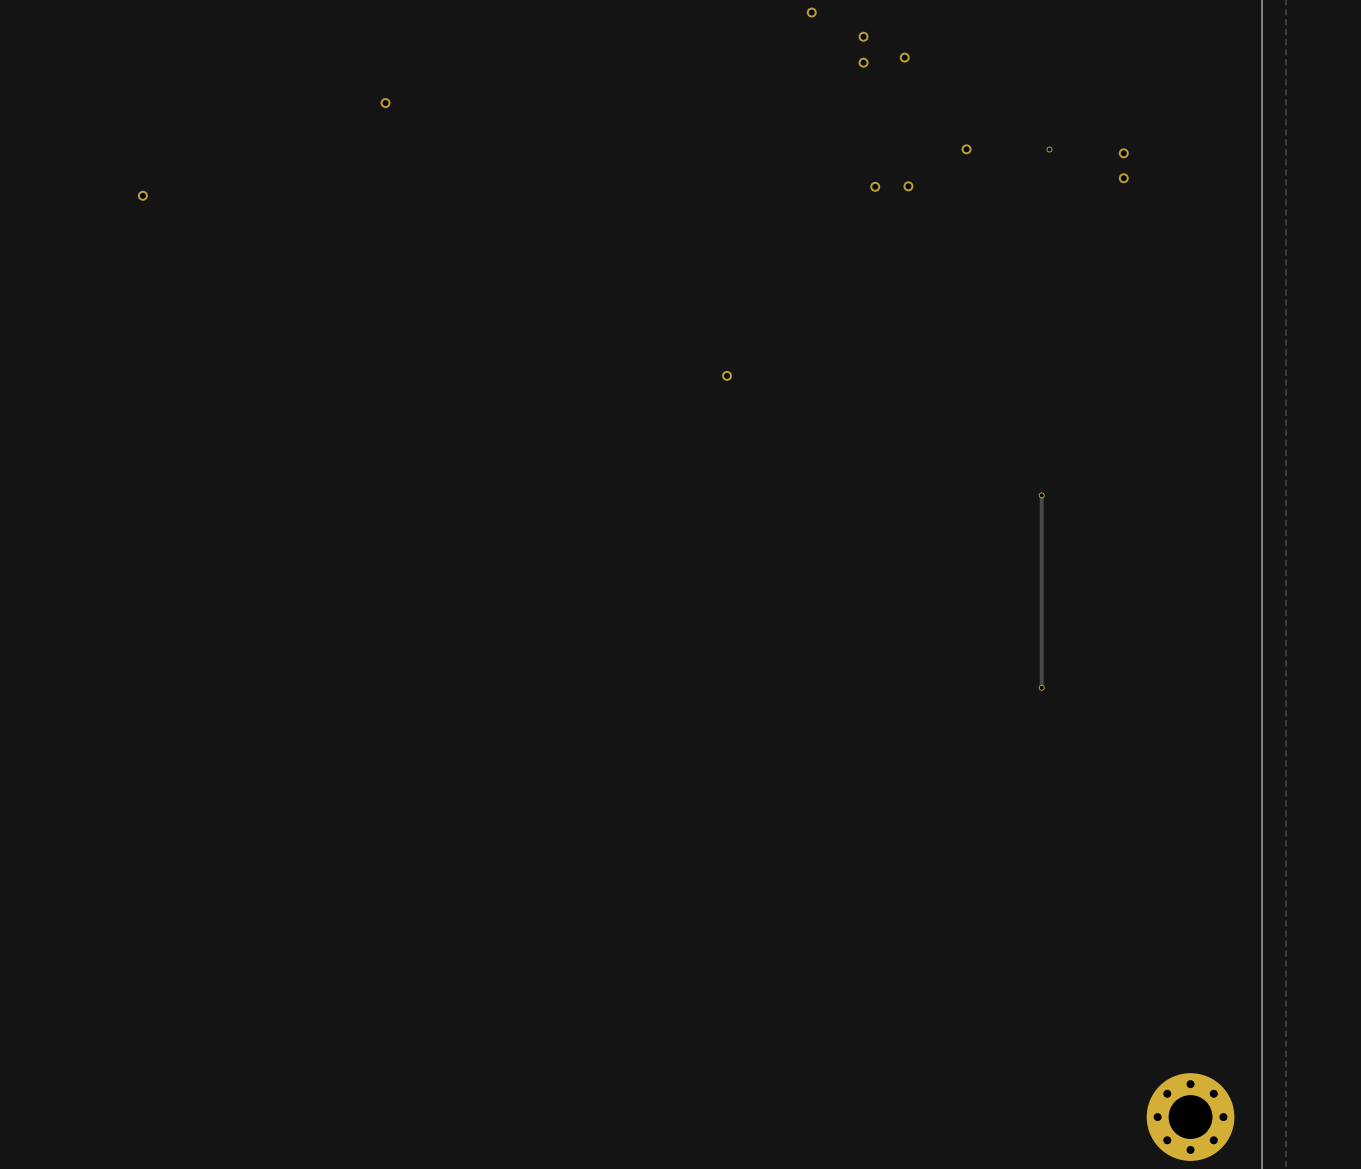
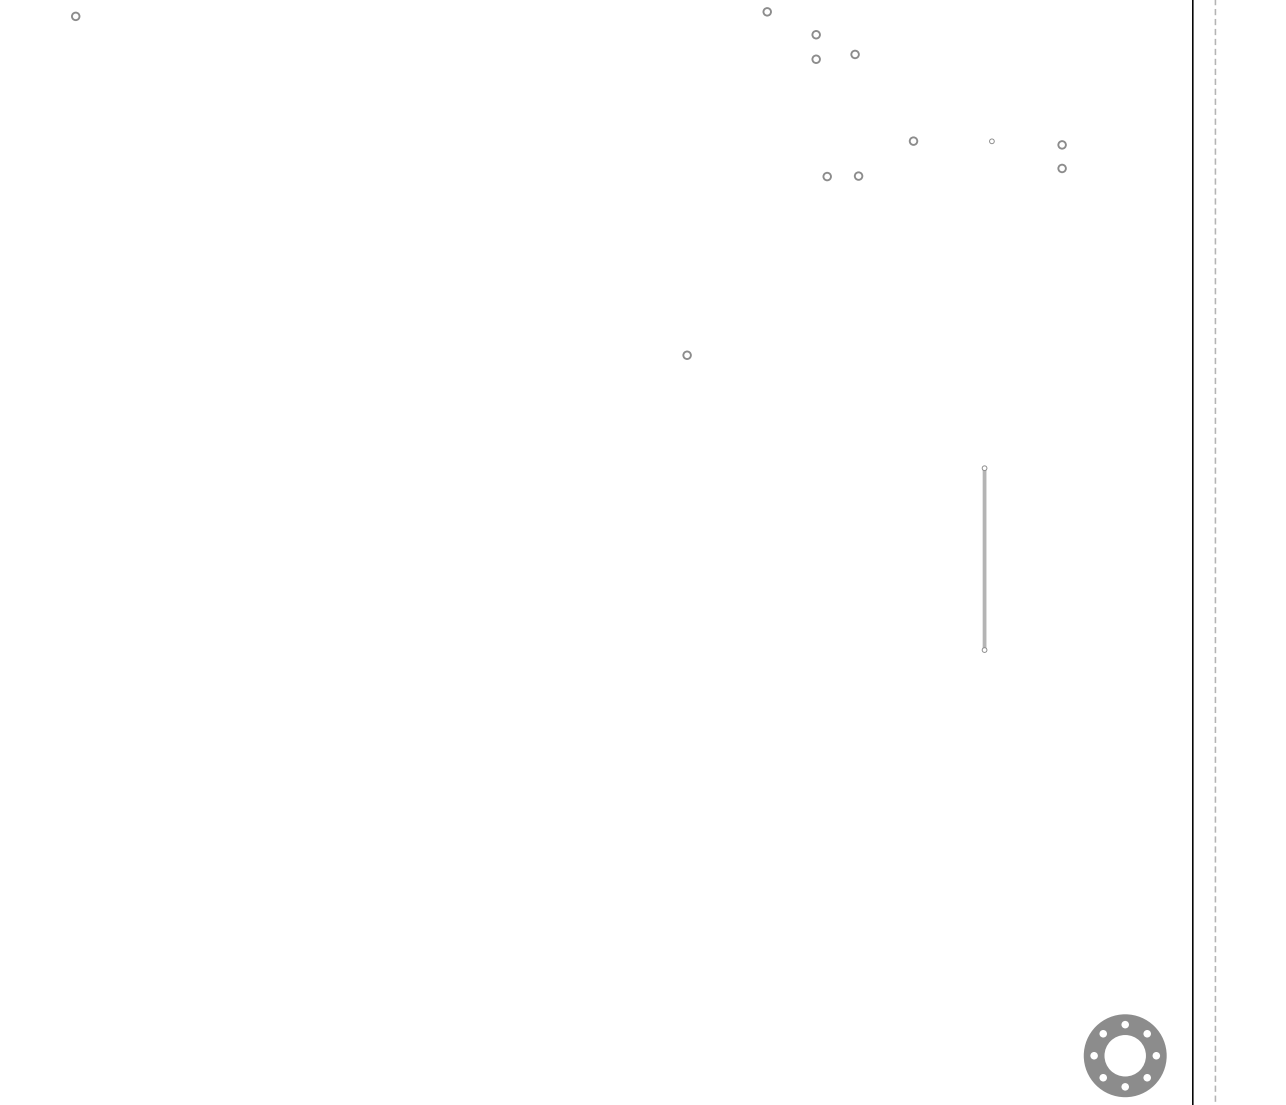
via: none -> (75, 16)
via: (385, 103) -> none
via: (142, 195) -> none

